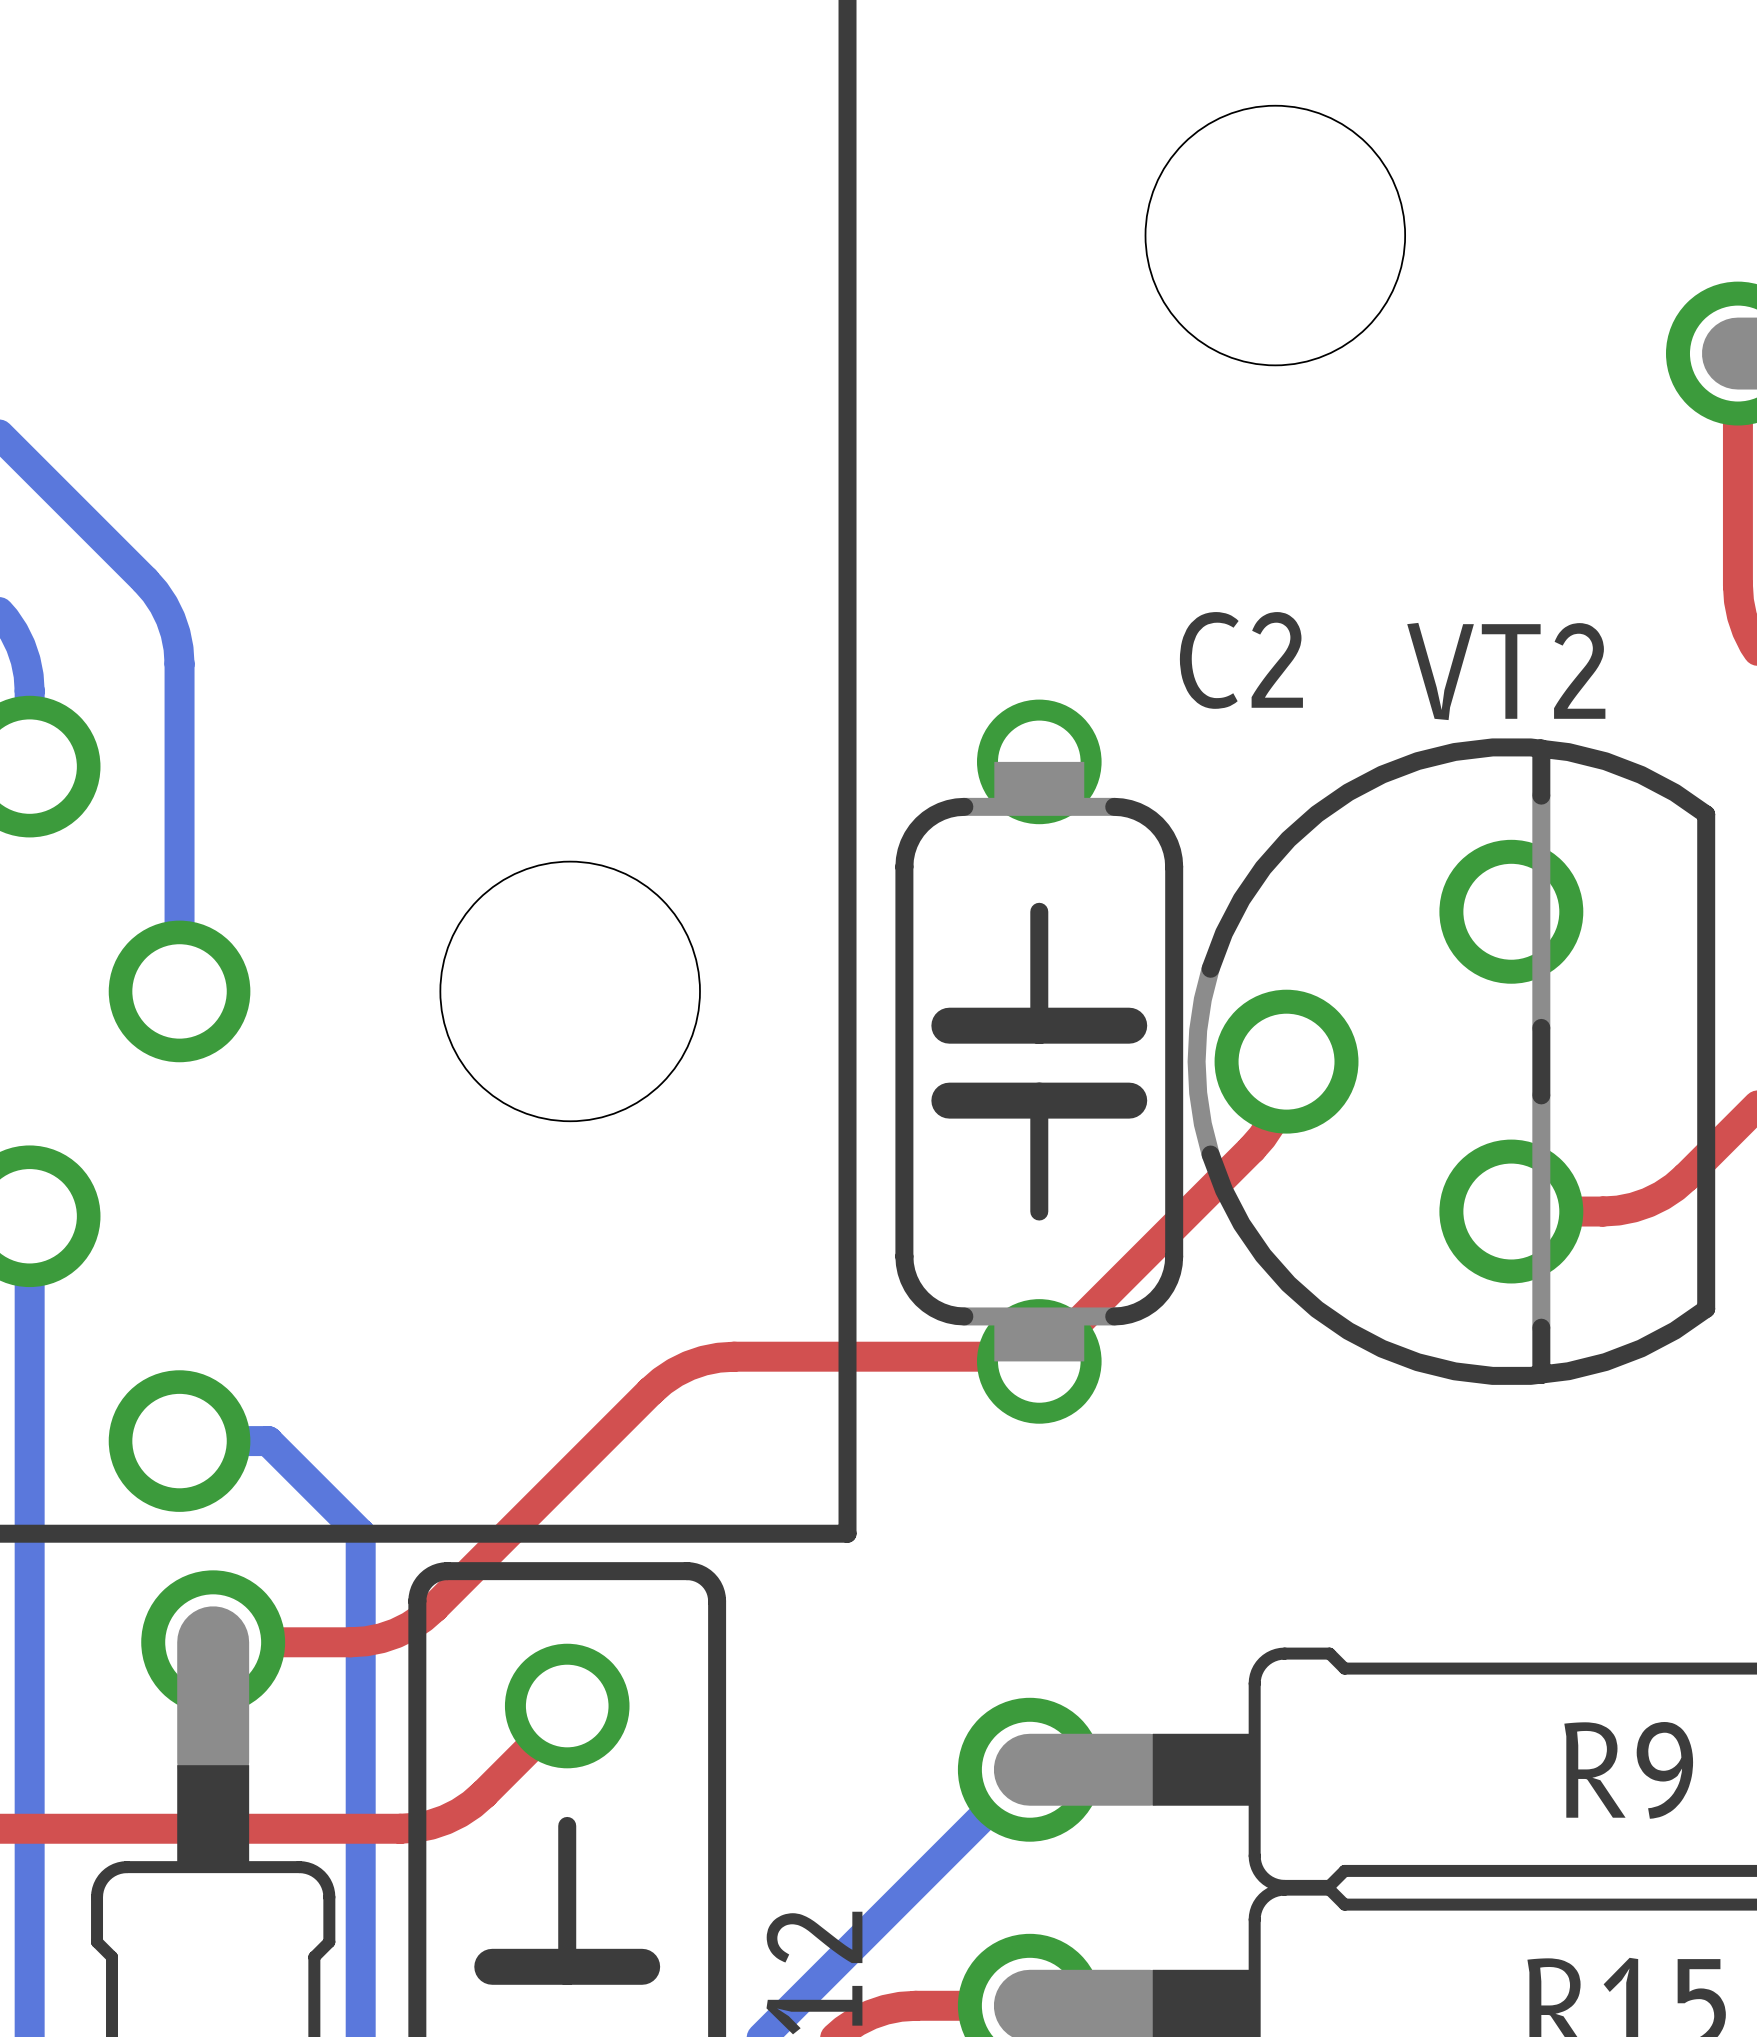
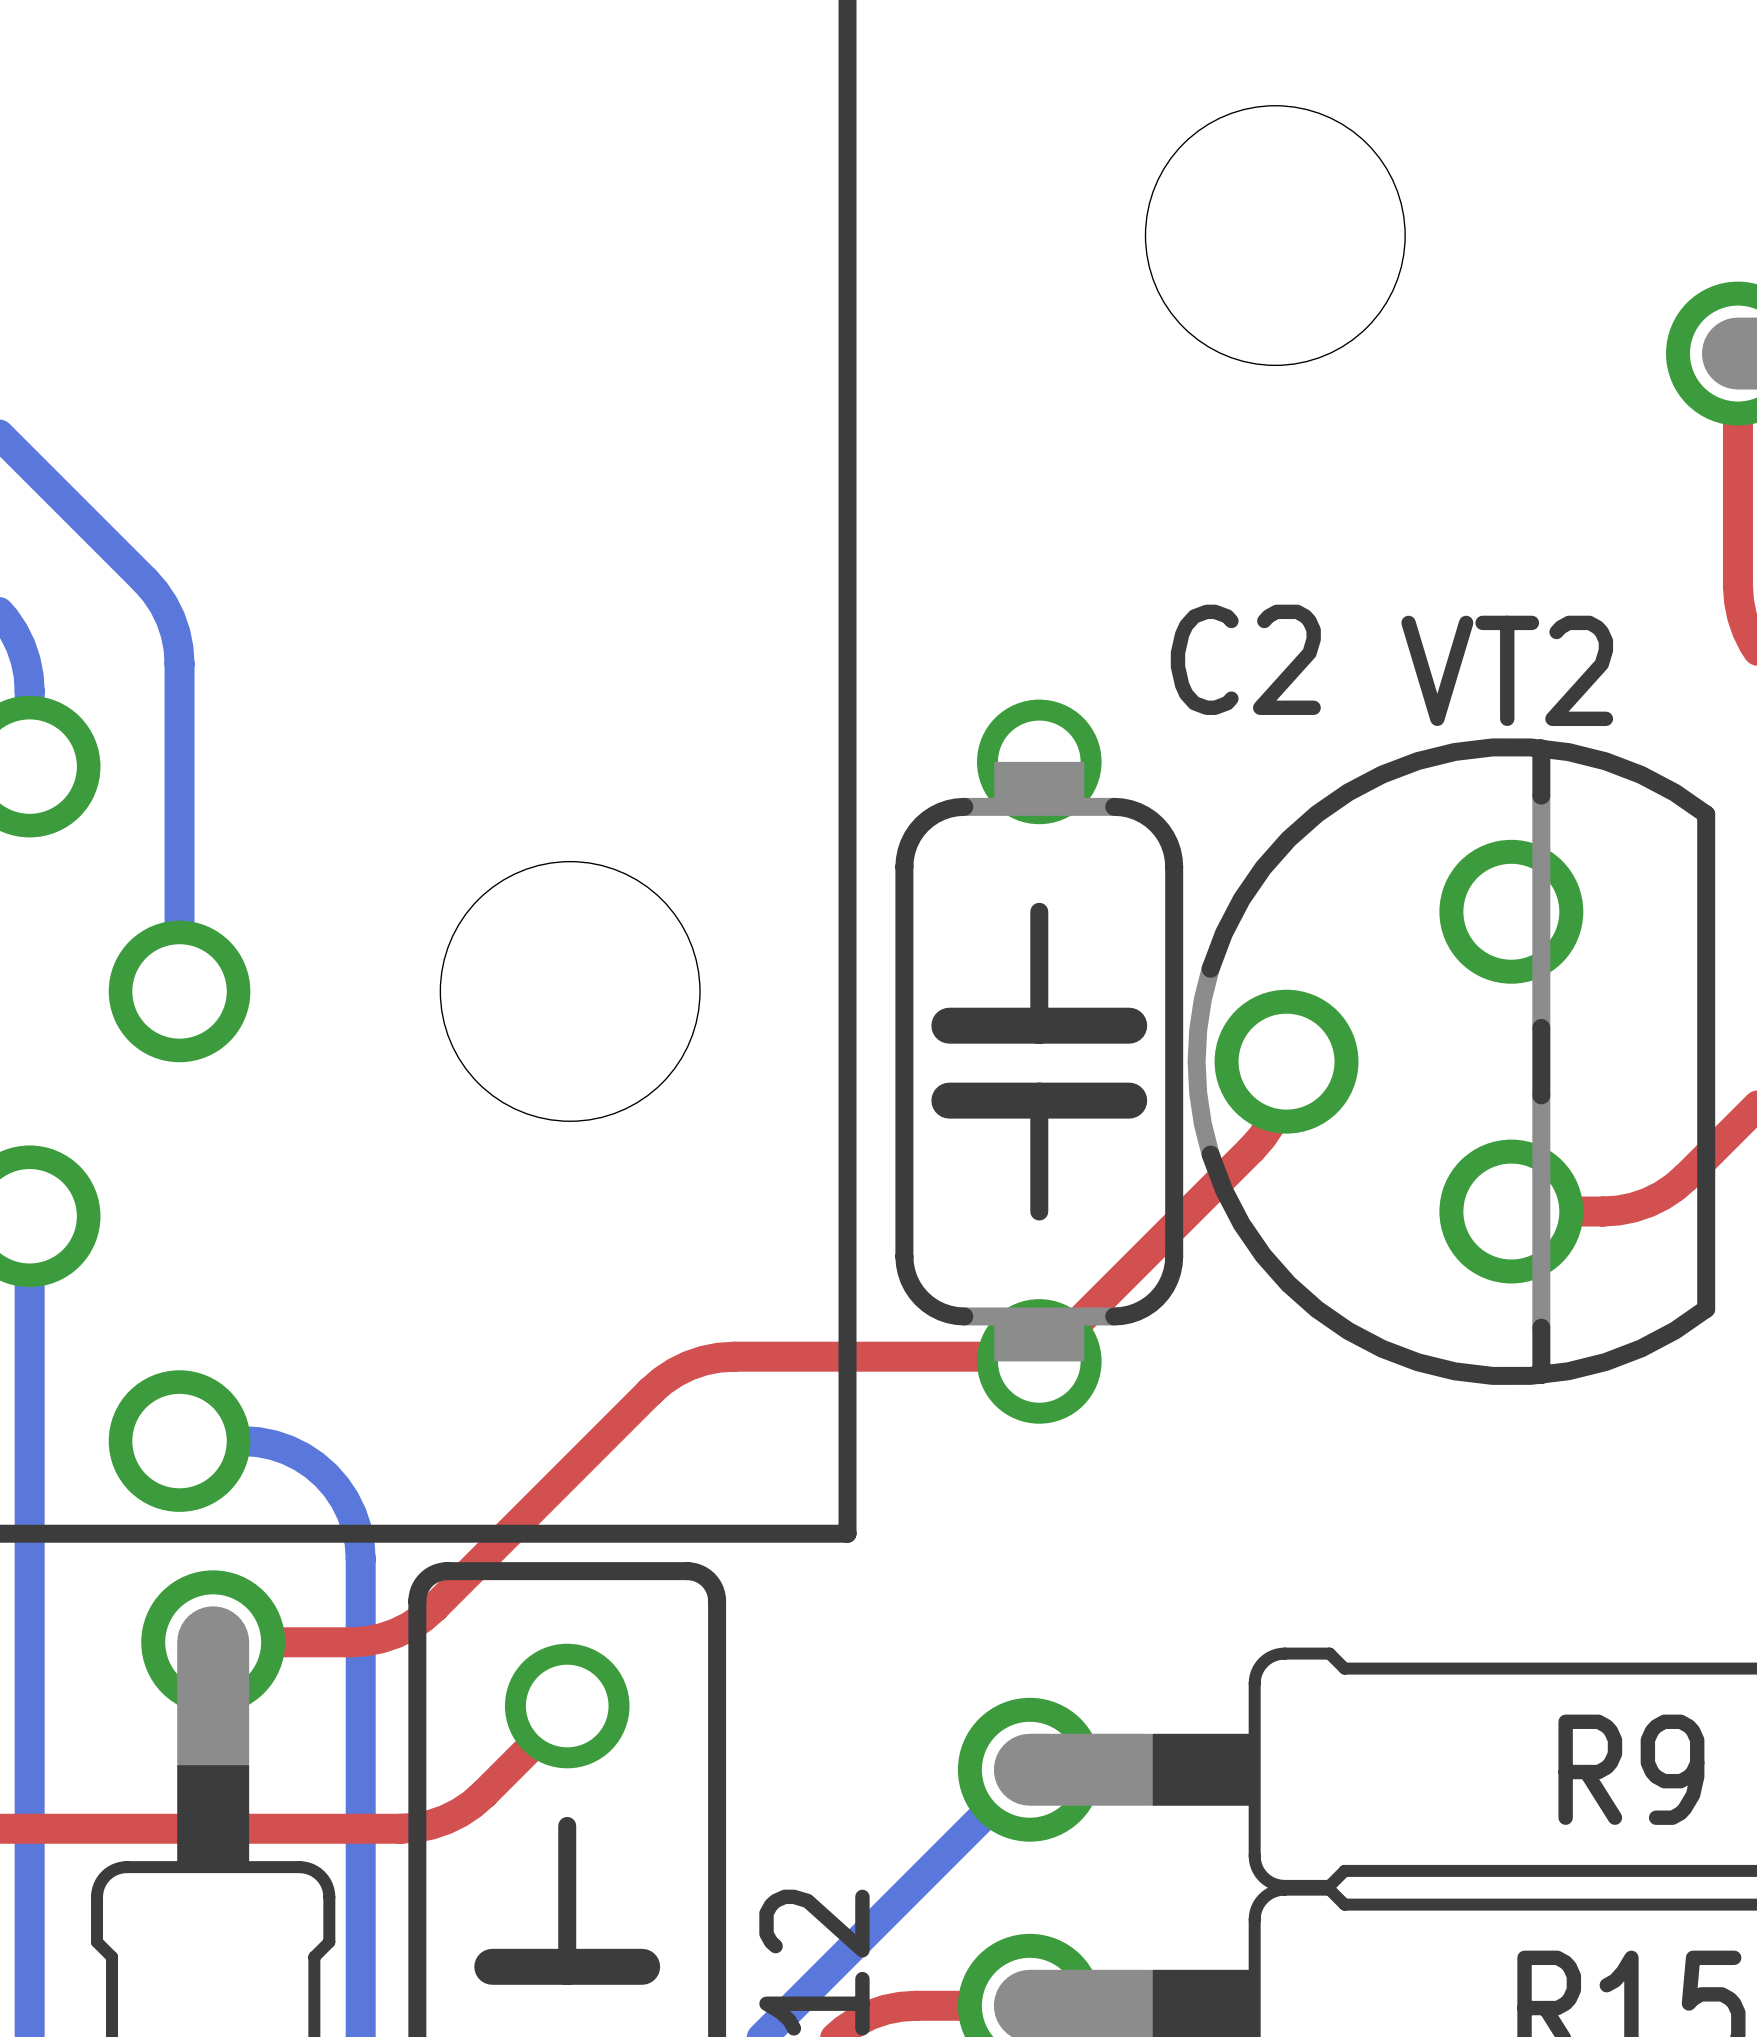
bottom track: (242, 1441) (268, 1441) (360, 1533) (360, 1559) -> (242, 1441) (273, 1445) (287, 1450) (301, 1456) (326, 1475) (344, 1500) (351, 1513) (356, 1528) (360, 1559)

